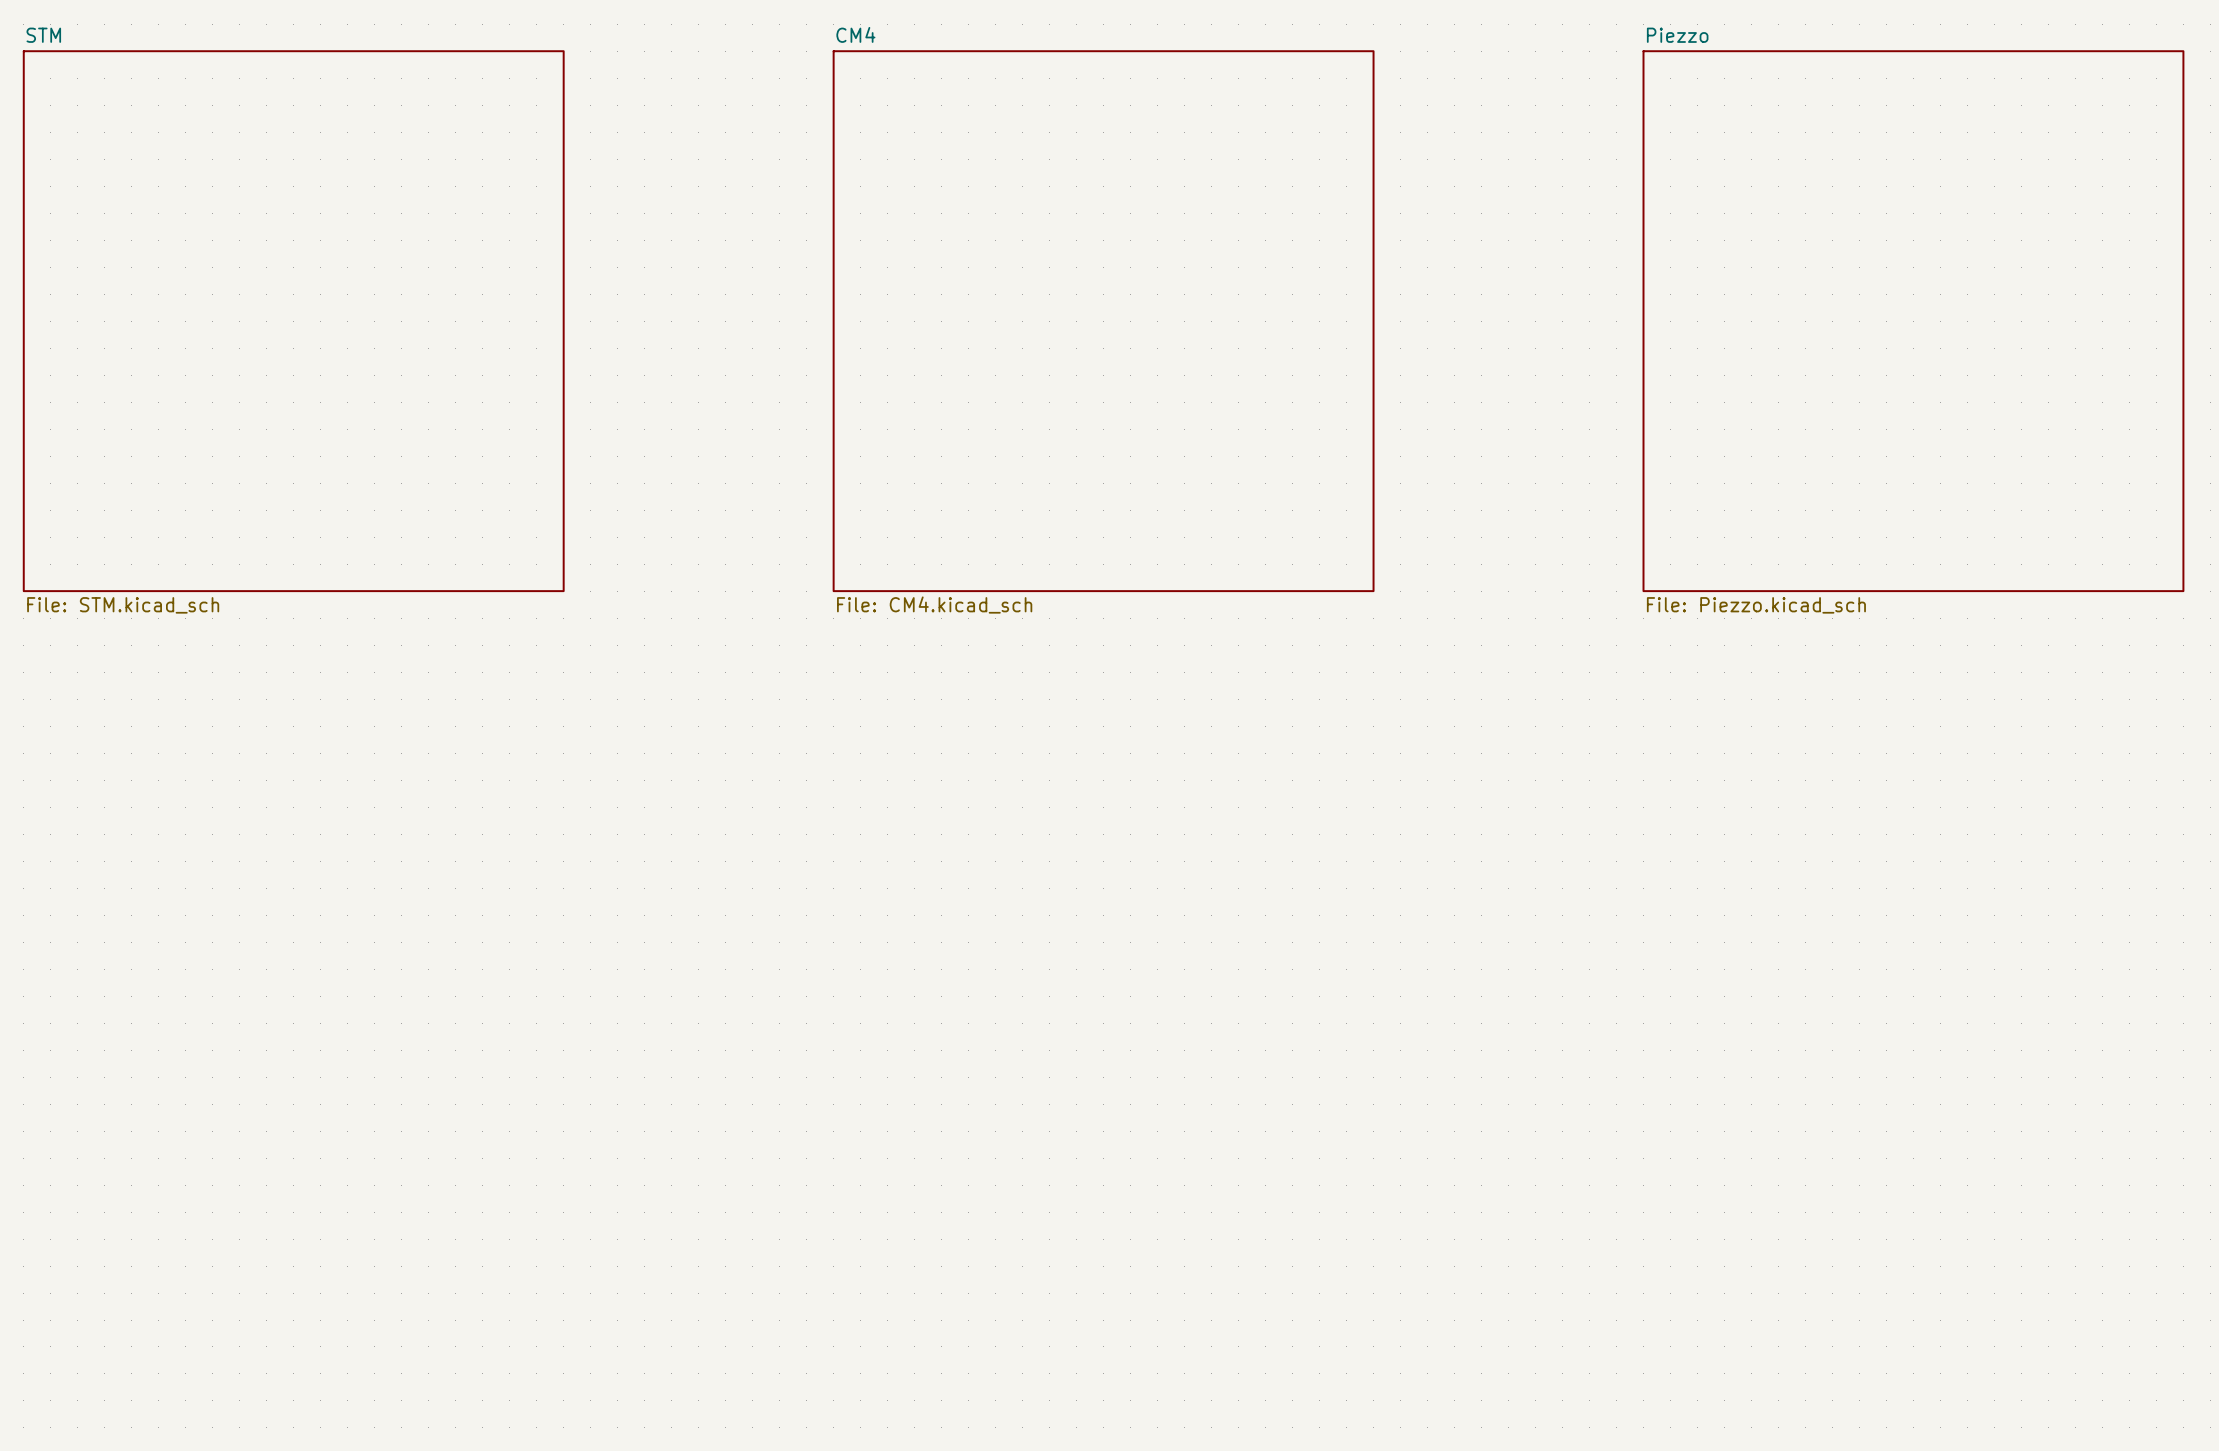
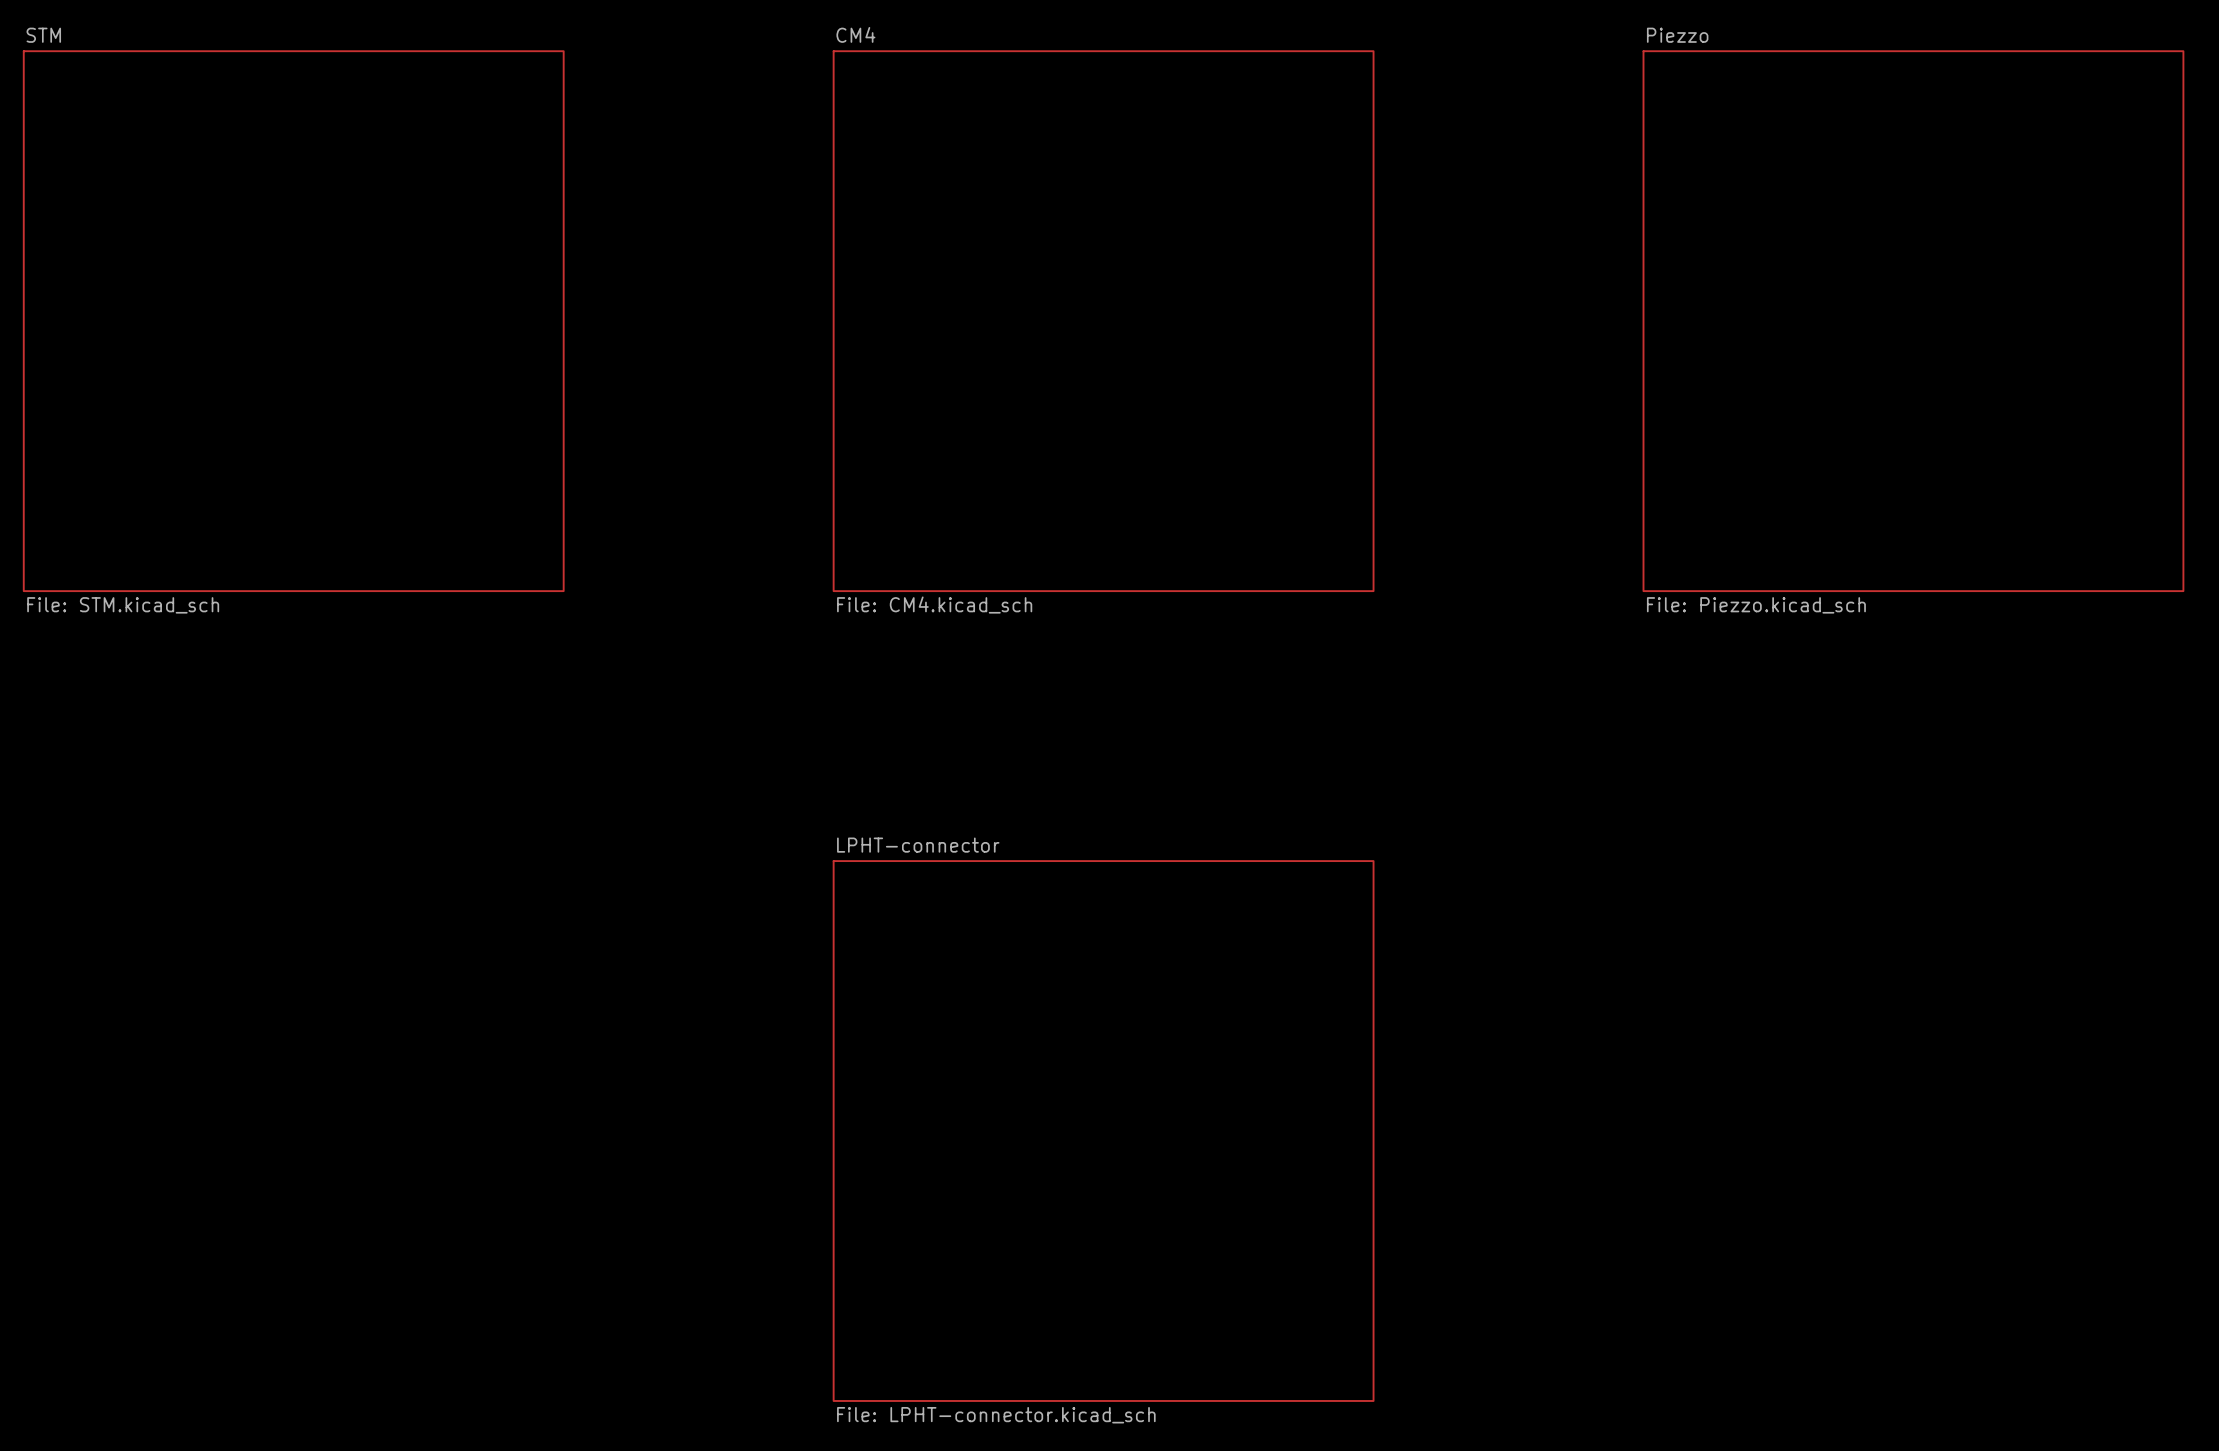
sheet LPHT-connector: none -> File: LPHT-connector.kicad_sch (1103, 1131)

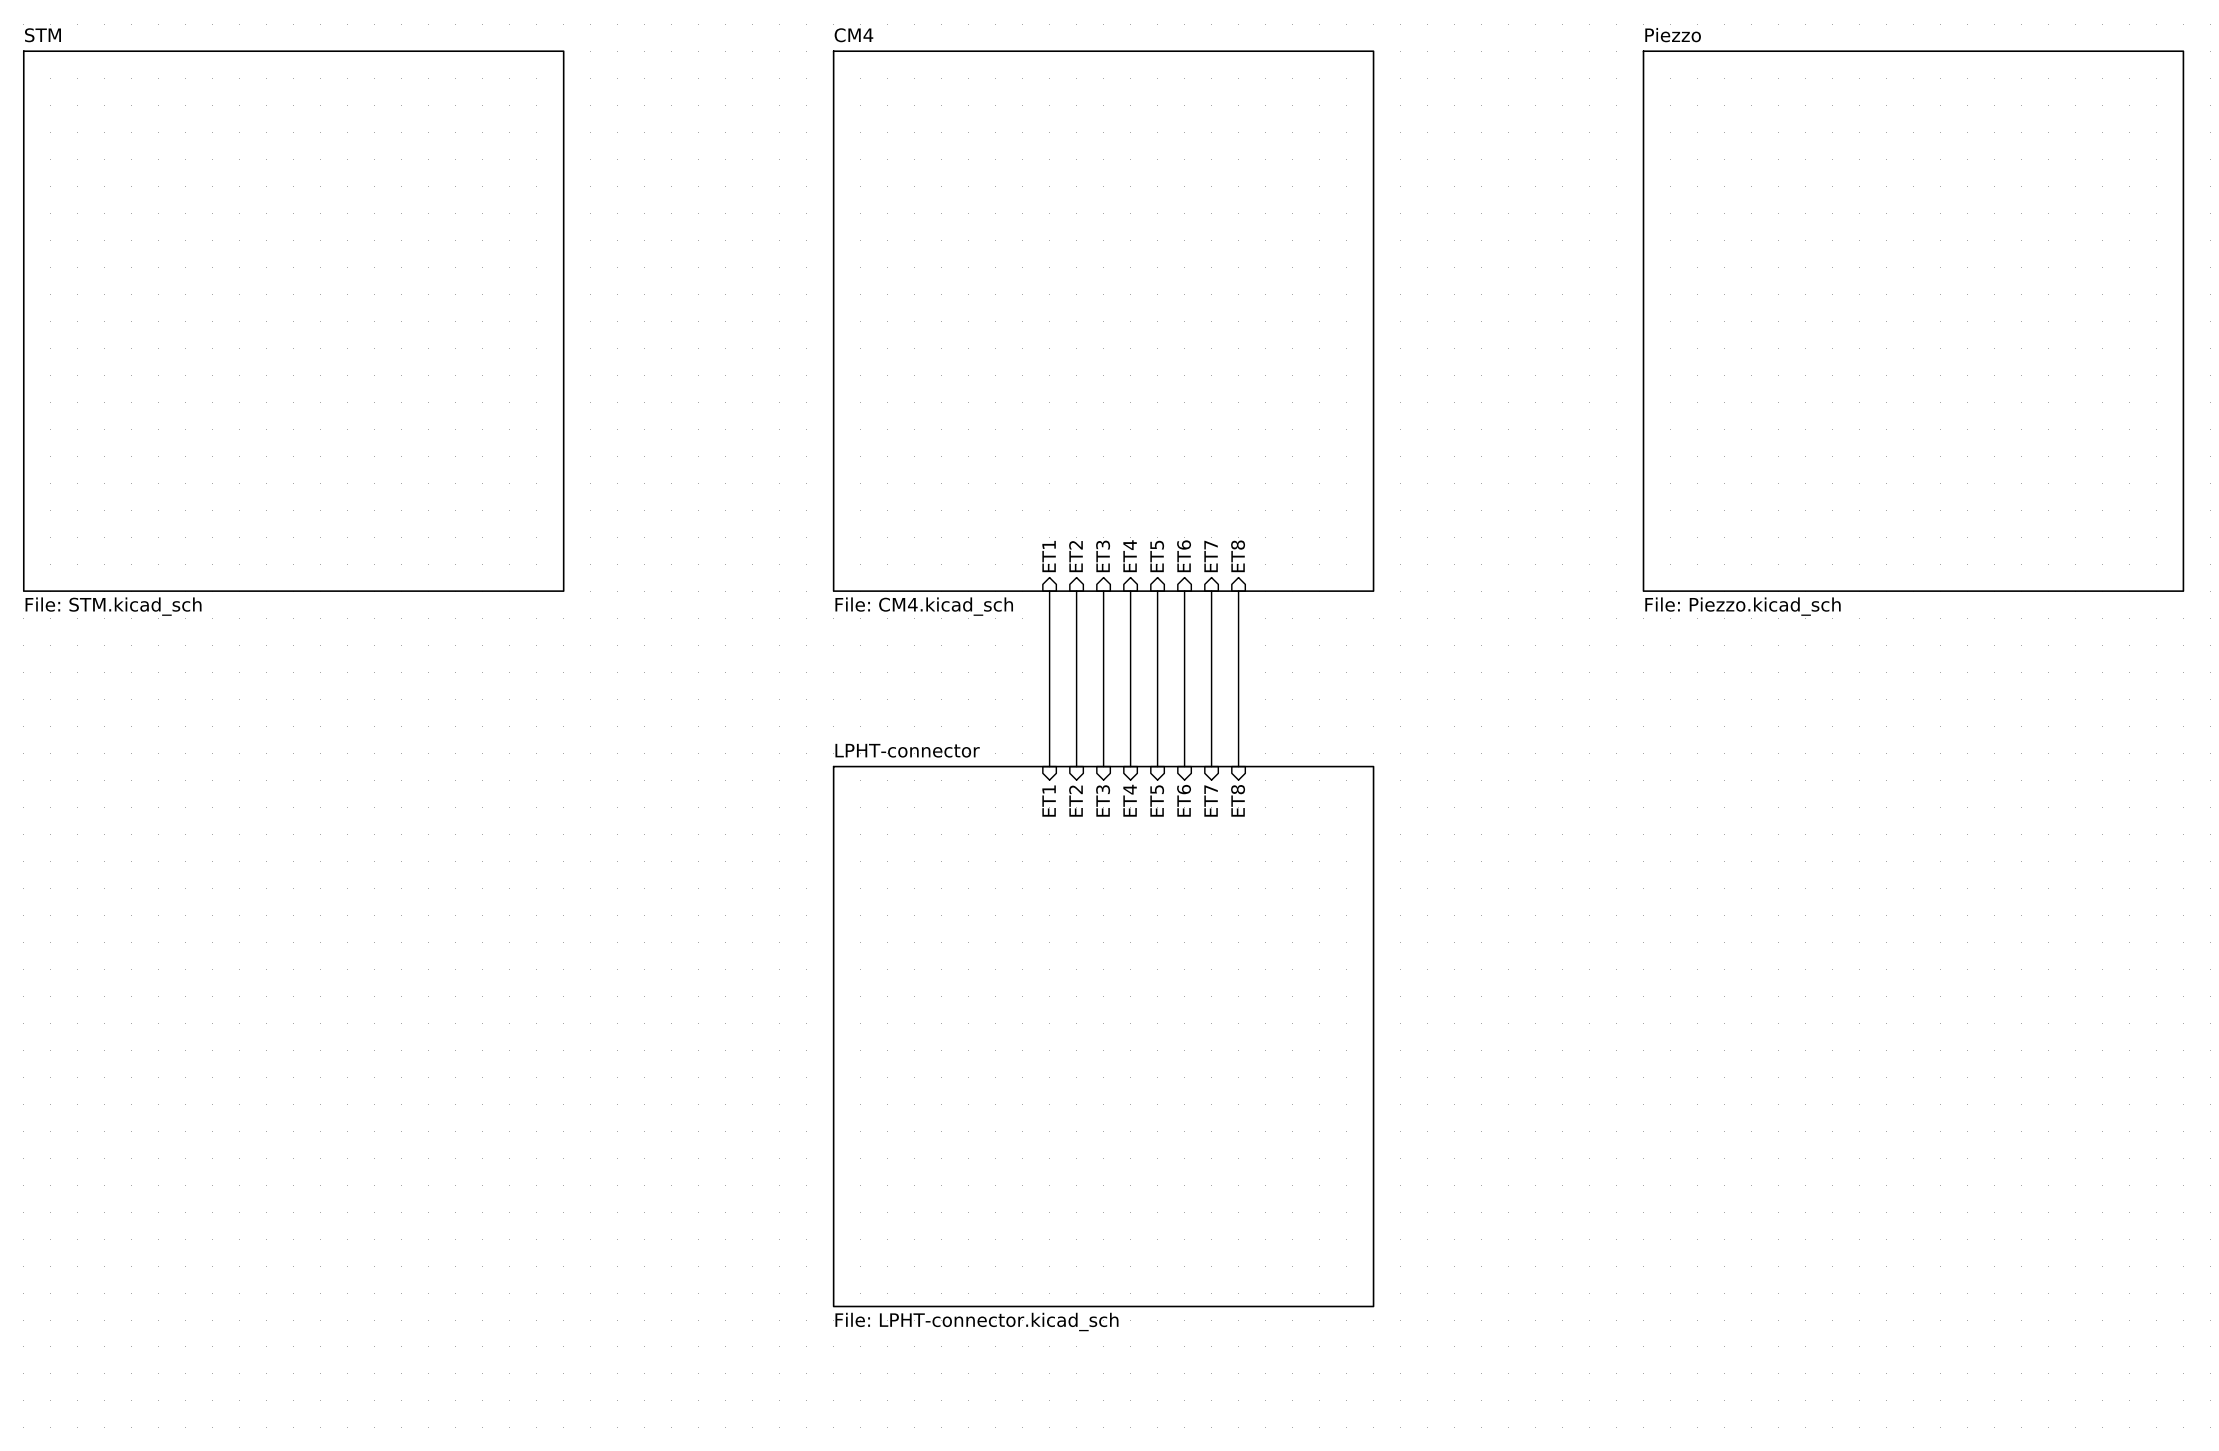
sheet pin: none -> ET1 (1049, 556)
sheet pin: none -> ET2 (1075, 556)
sheet pin: none -> ET3 (1103, 556)
sheet pin: none -> ET4 (1130, 556)
sheet pin: none -> ET5 (1157, 556)
sheet pin: none -> ET6 (1184, 556)
sheet pin: none -> ET7 (1211, 556)
sheet pin: none -> ET8 (1238, 556)
wire: none -> (1049, 591) (1049, 766)
wire: none -> (1076, 591) (1076, 766)
wire: none -> (1103, 591) (1103, 766)
wire: none -> (1130, 591) (1130, 766)
wire: none -> (1157, 591) (1157, 766)
wire: none -> (1184, 591) (1184, 766)
wire: none -> (1211, 591) (1211, 766)
wire: none -> (1238, 591) (1238, 766)
sheet pin: none -> ET4 (1130, 800)
sheet pin: none -> ET7 (1211, 801)
sheet pin: none -> ET1 (1049, 801)
sheet pin: none -> ET2 (1075, 801)
sheet pin: none -> ET3 (1103, 800)
sheet pin: none -> ET5 (1157, 801)
sheet pin: none -> ET6 (1184, 800)
sheet pin: none -> ET8 (1238, 800)
sheet LPHT-connector position: (1103, 1131) -> (1103, 1036)

